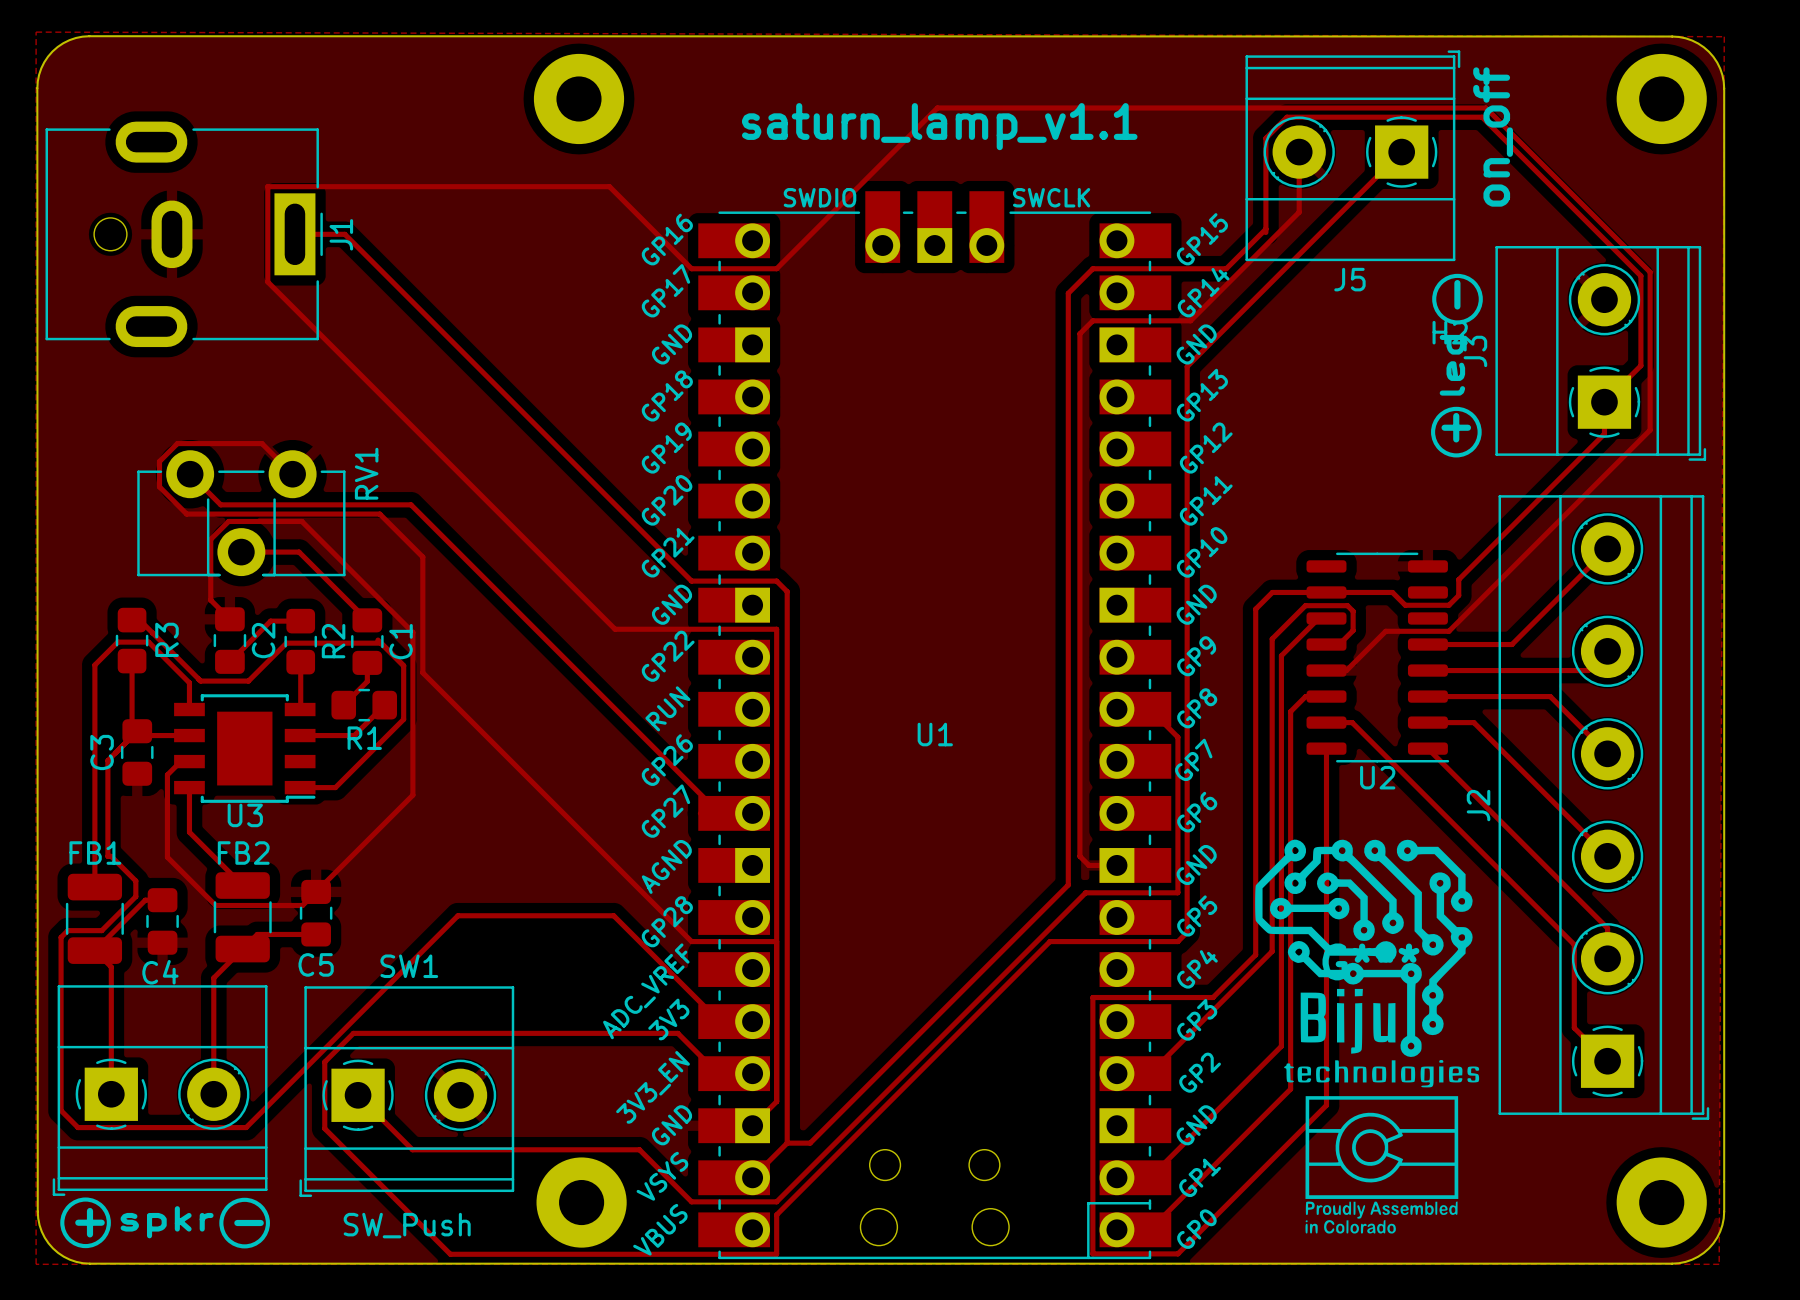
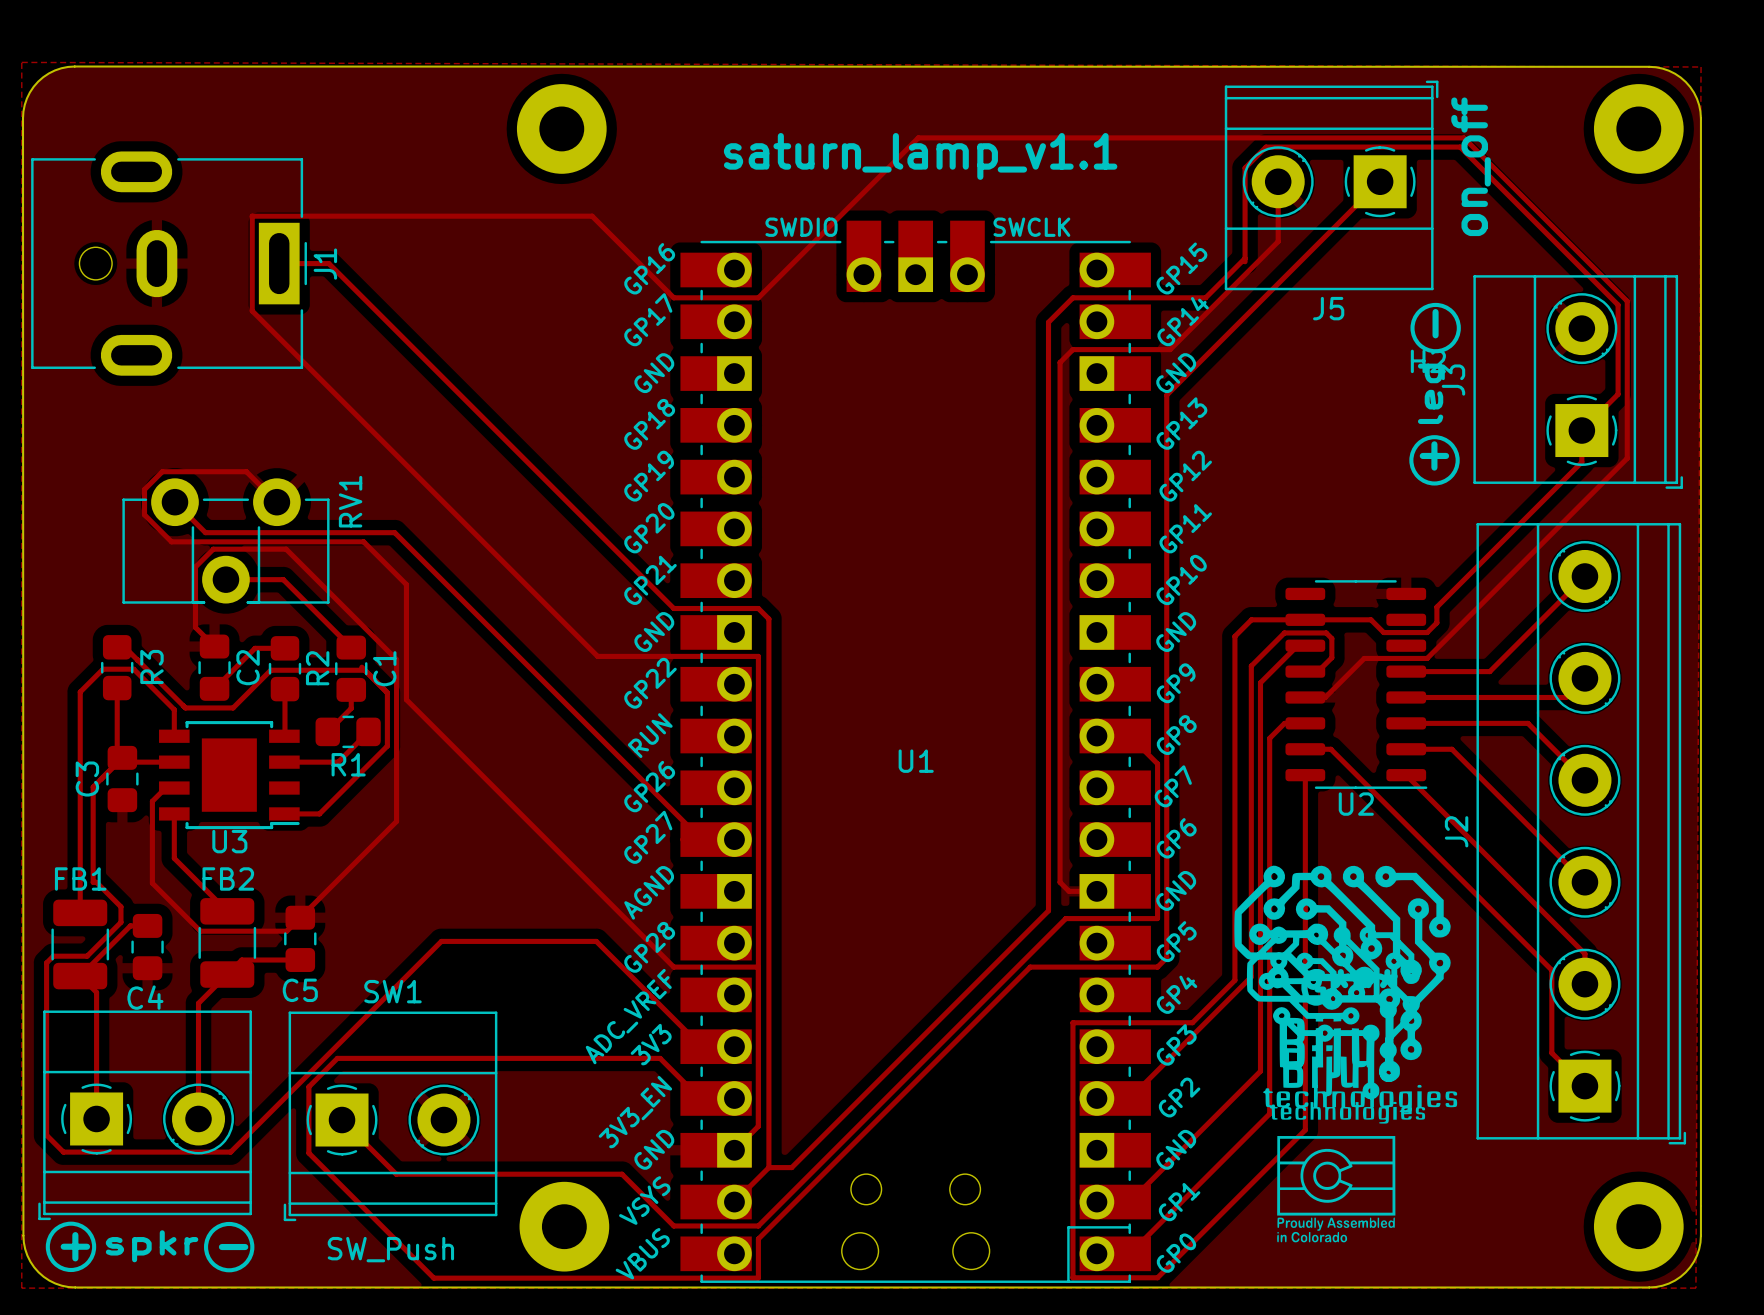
drawing: none -> [1246, 926, 1426, 1243]
drawing: [1305, 1096, 1459, 1234] -> none

